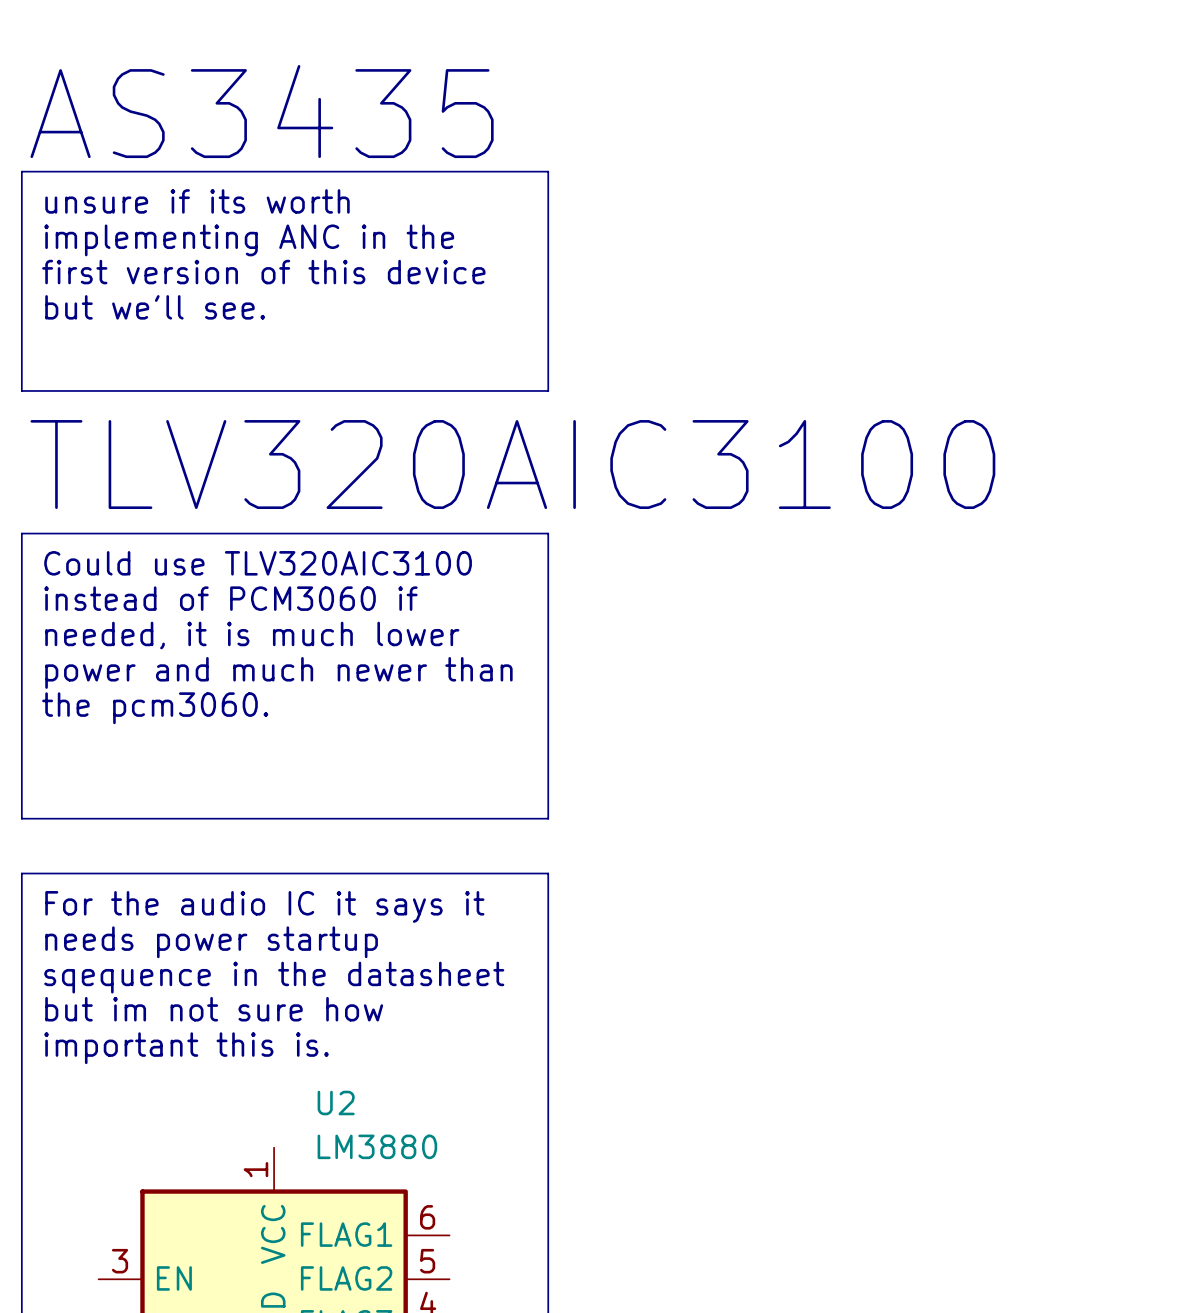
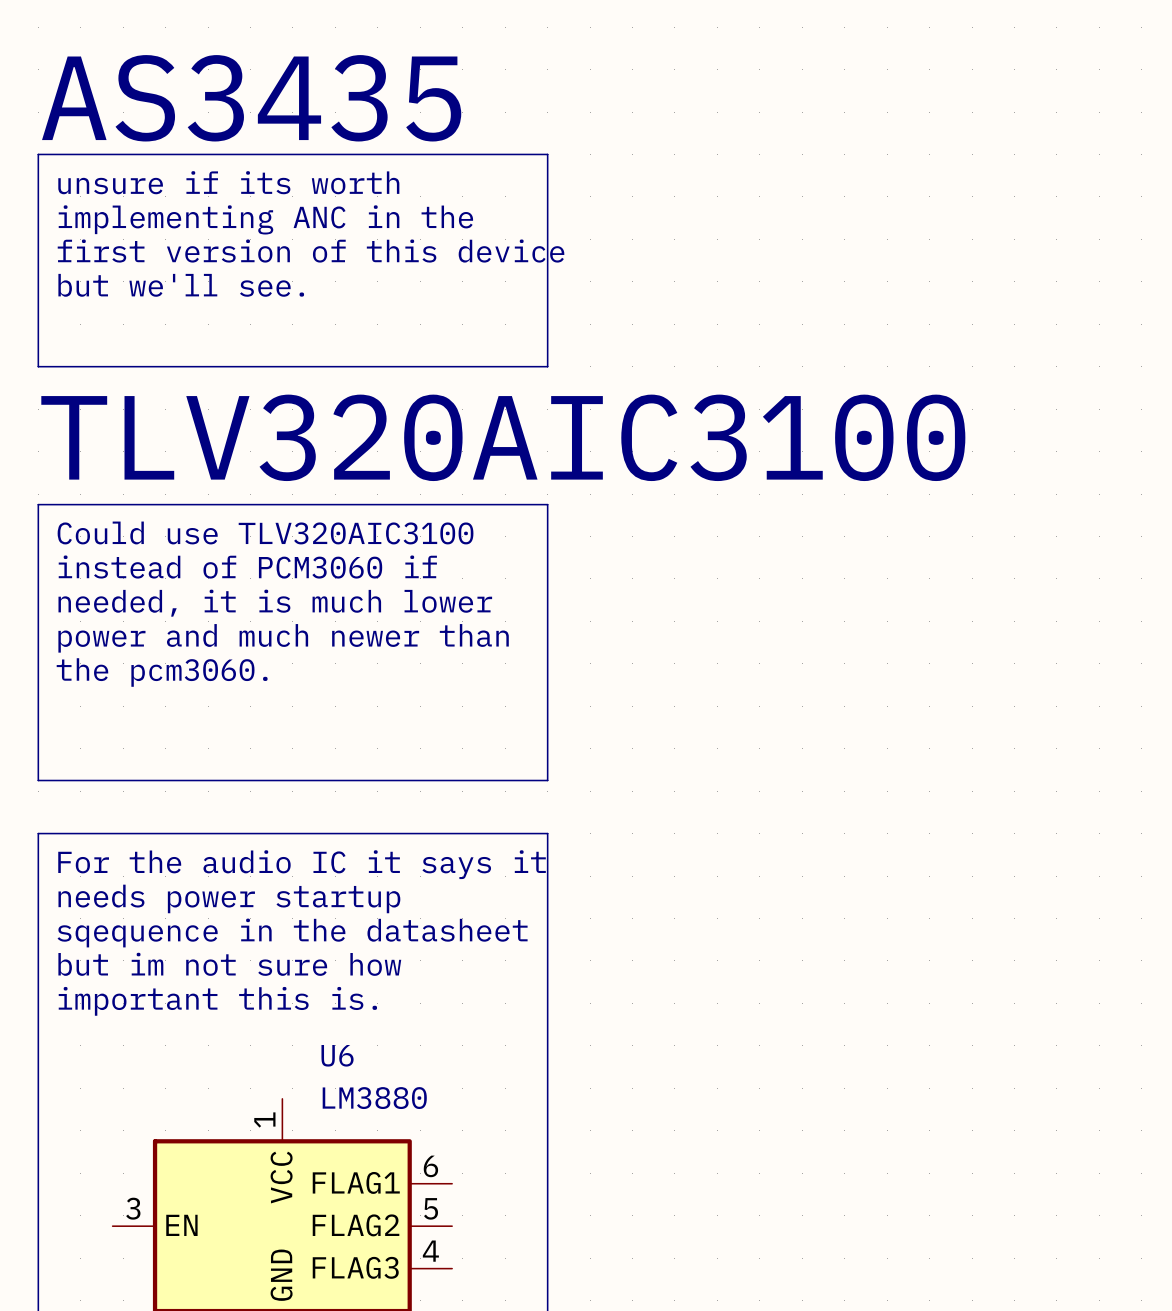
U2 name: U2 (336, 1103) -> U6 (337, 1055)

